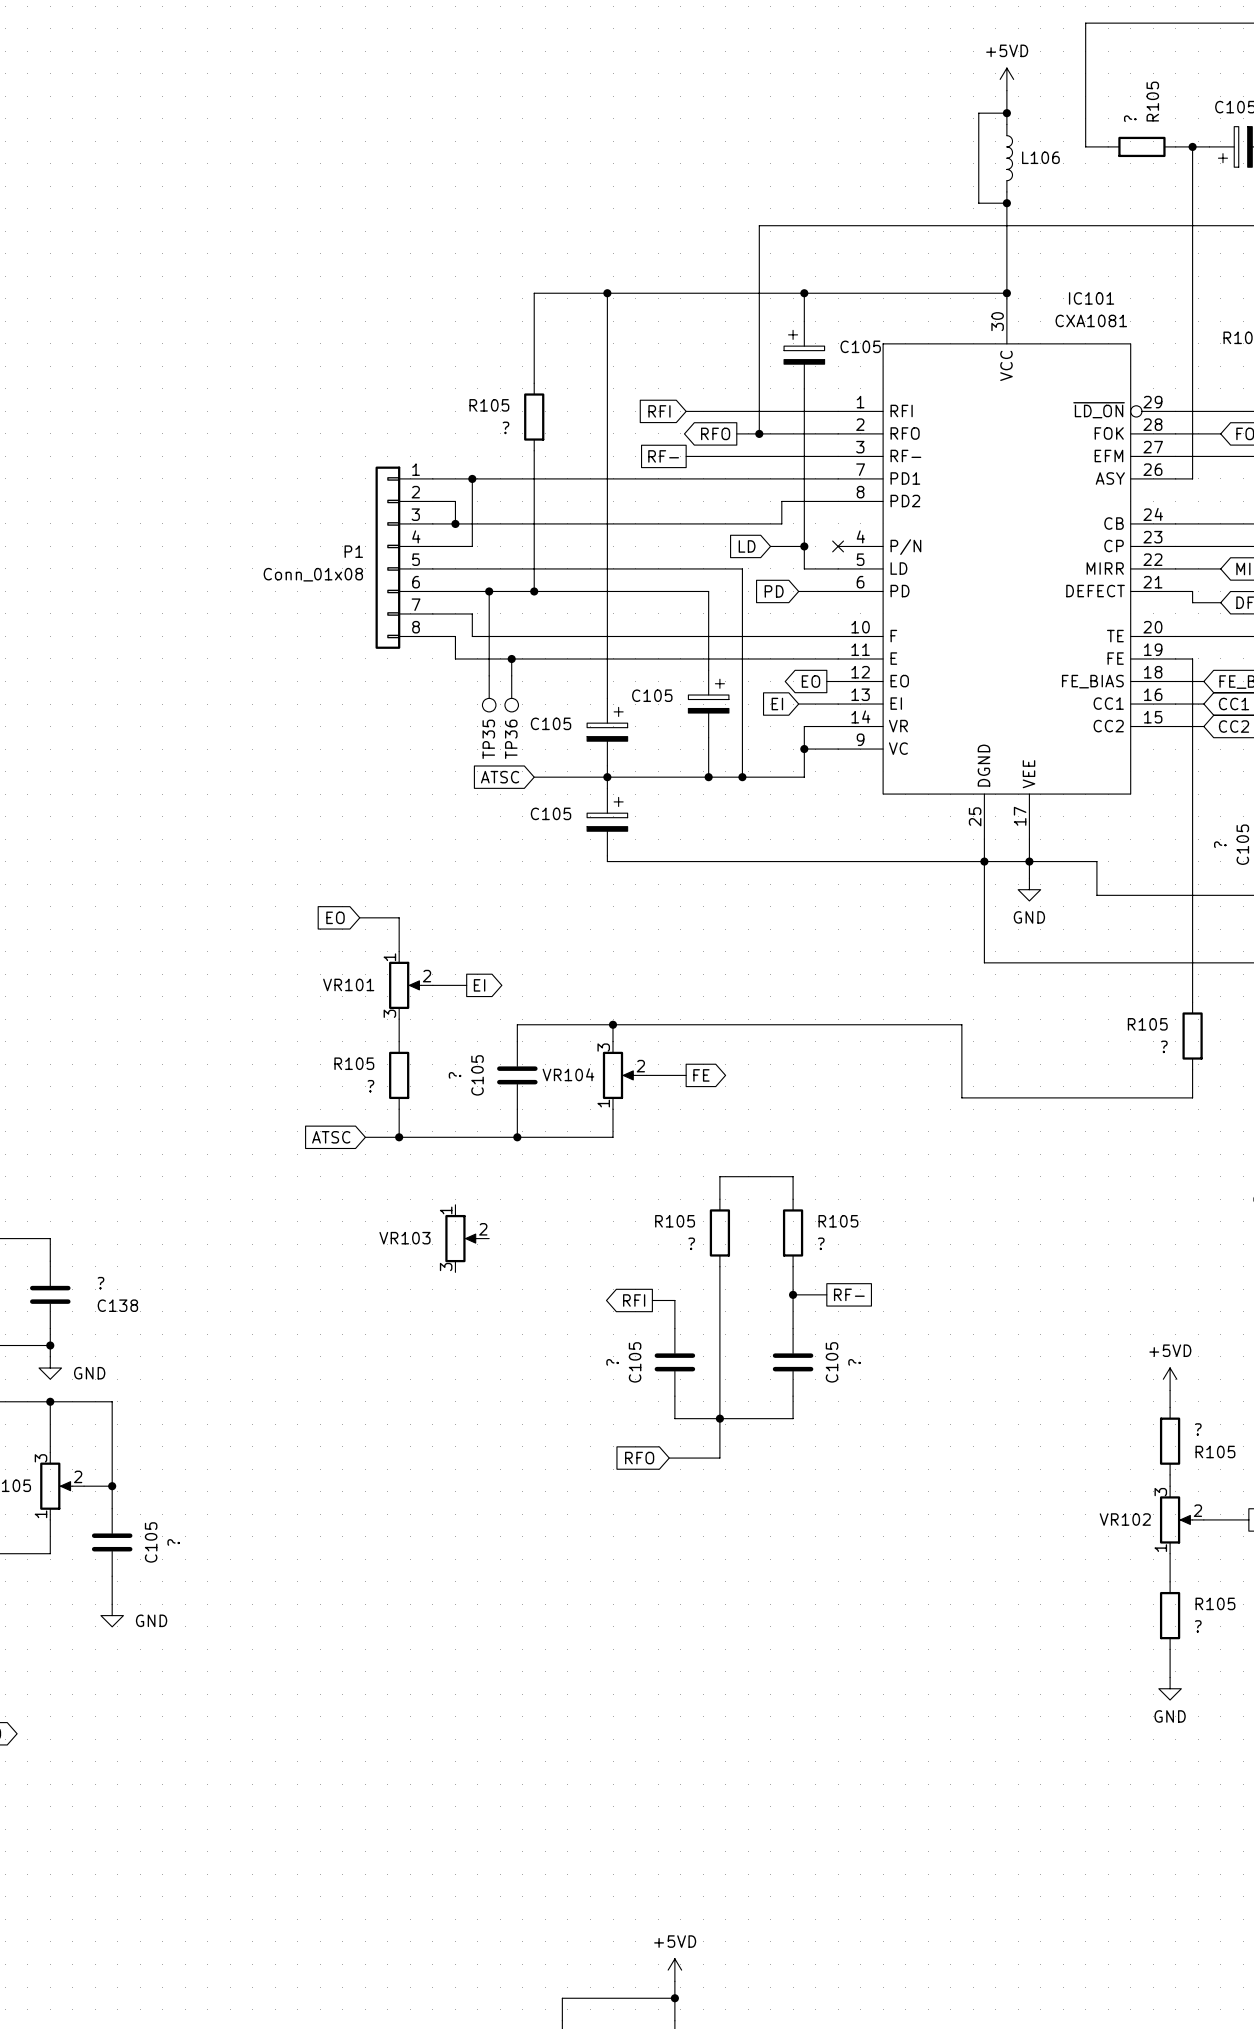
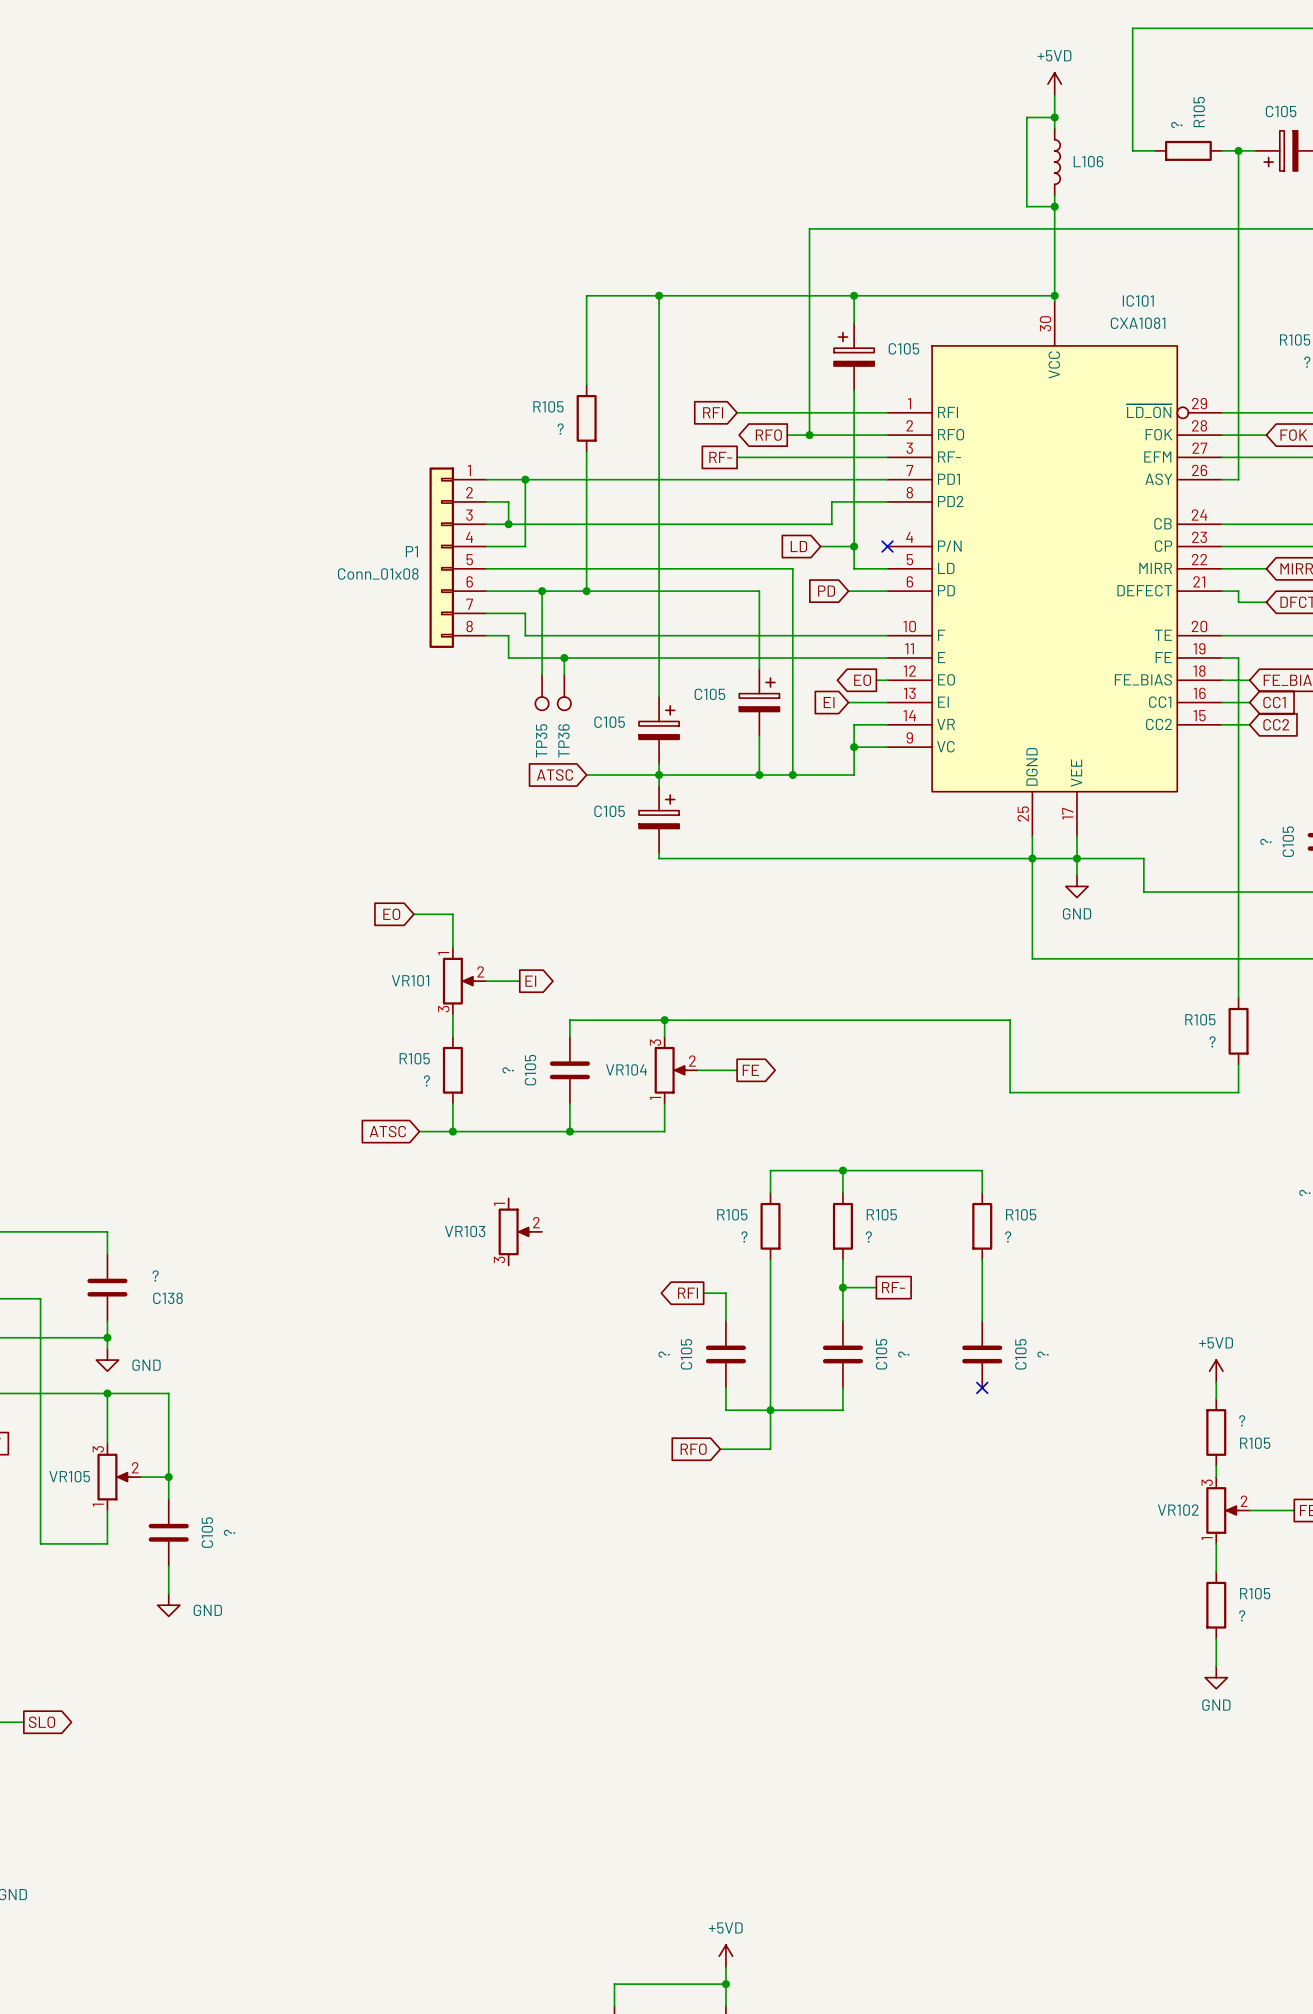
wire: none -> (842, 1170) (982, 1170) (982, 1192)
junction: none -> (842, 1170)
R105: none -> ? (982, 1226)
wire: none -> (982, 1259) (982, 1321)
C105: none -> ? (982, 1354)
no-connect mark: none -> (982, 1387)

